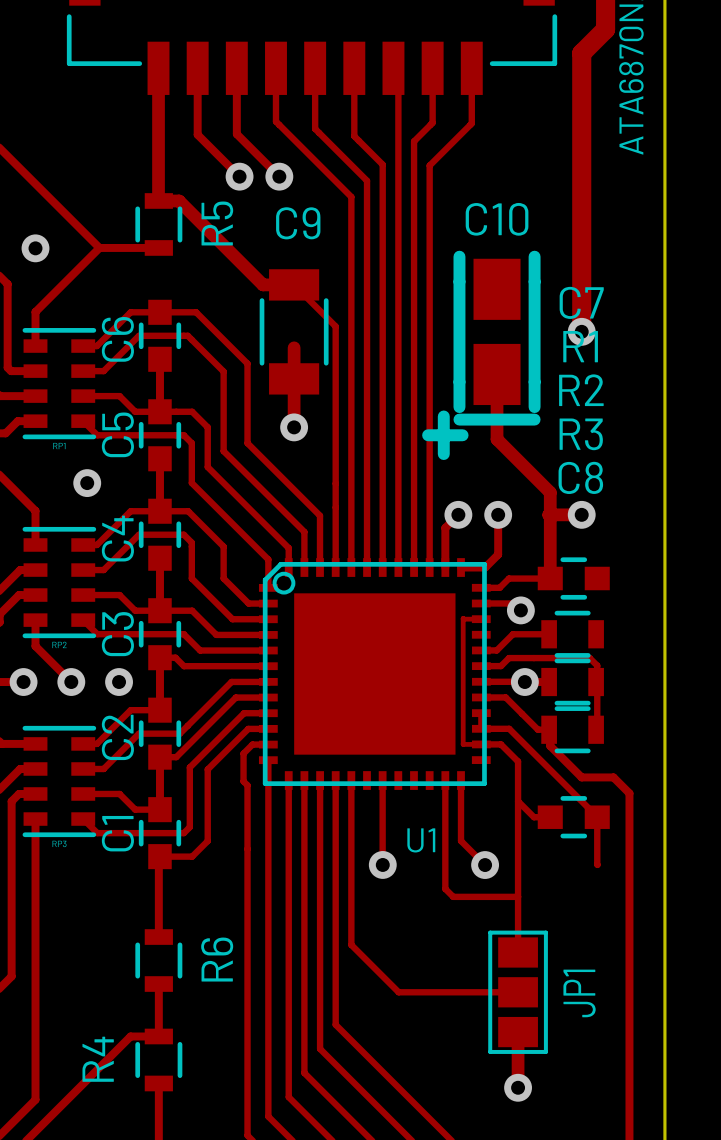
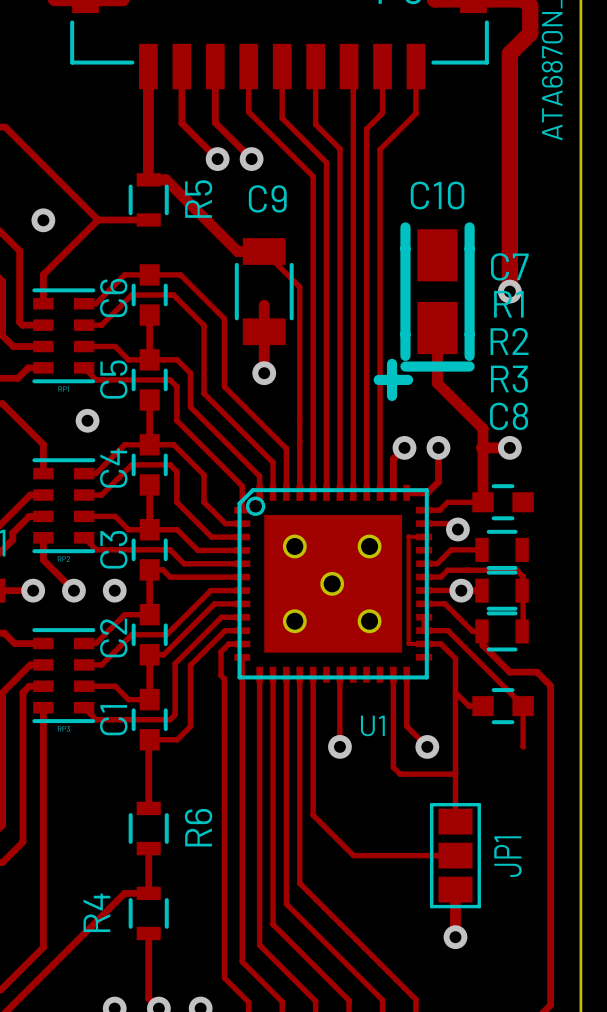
part: none -> (294, 546)
part: none -> (369, 546)
part: none -> (332, 583)
part: none -> (294, 621)
part: none -> (369, 621)

